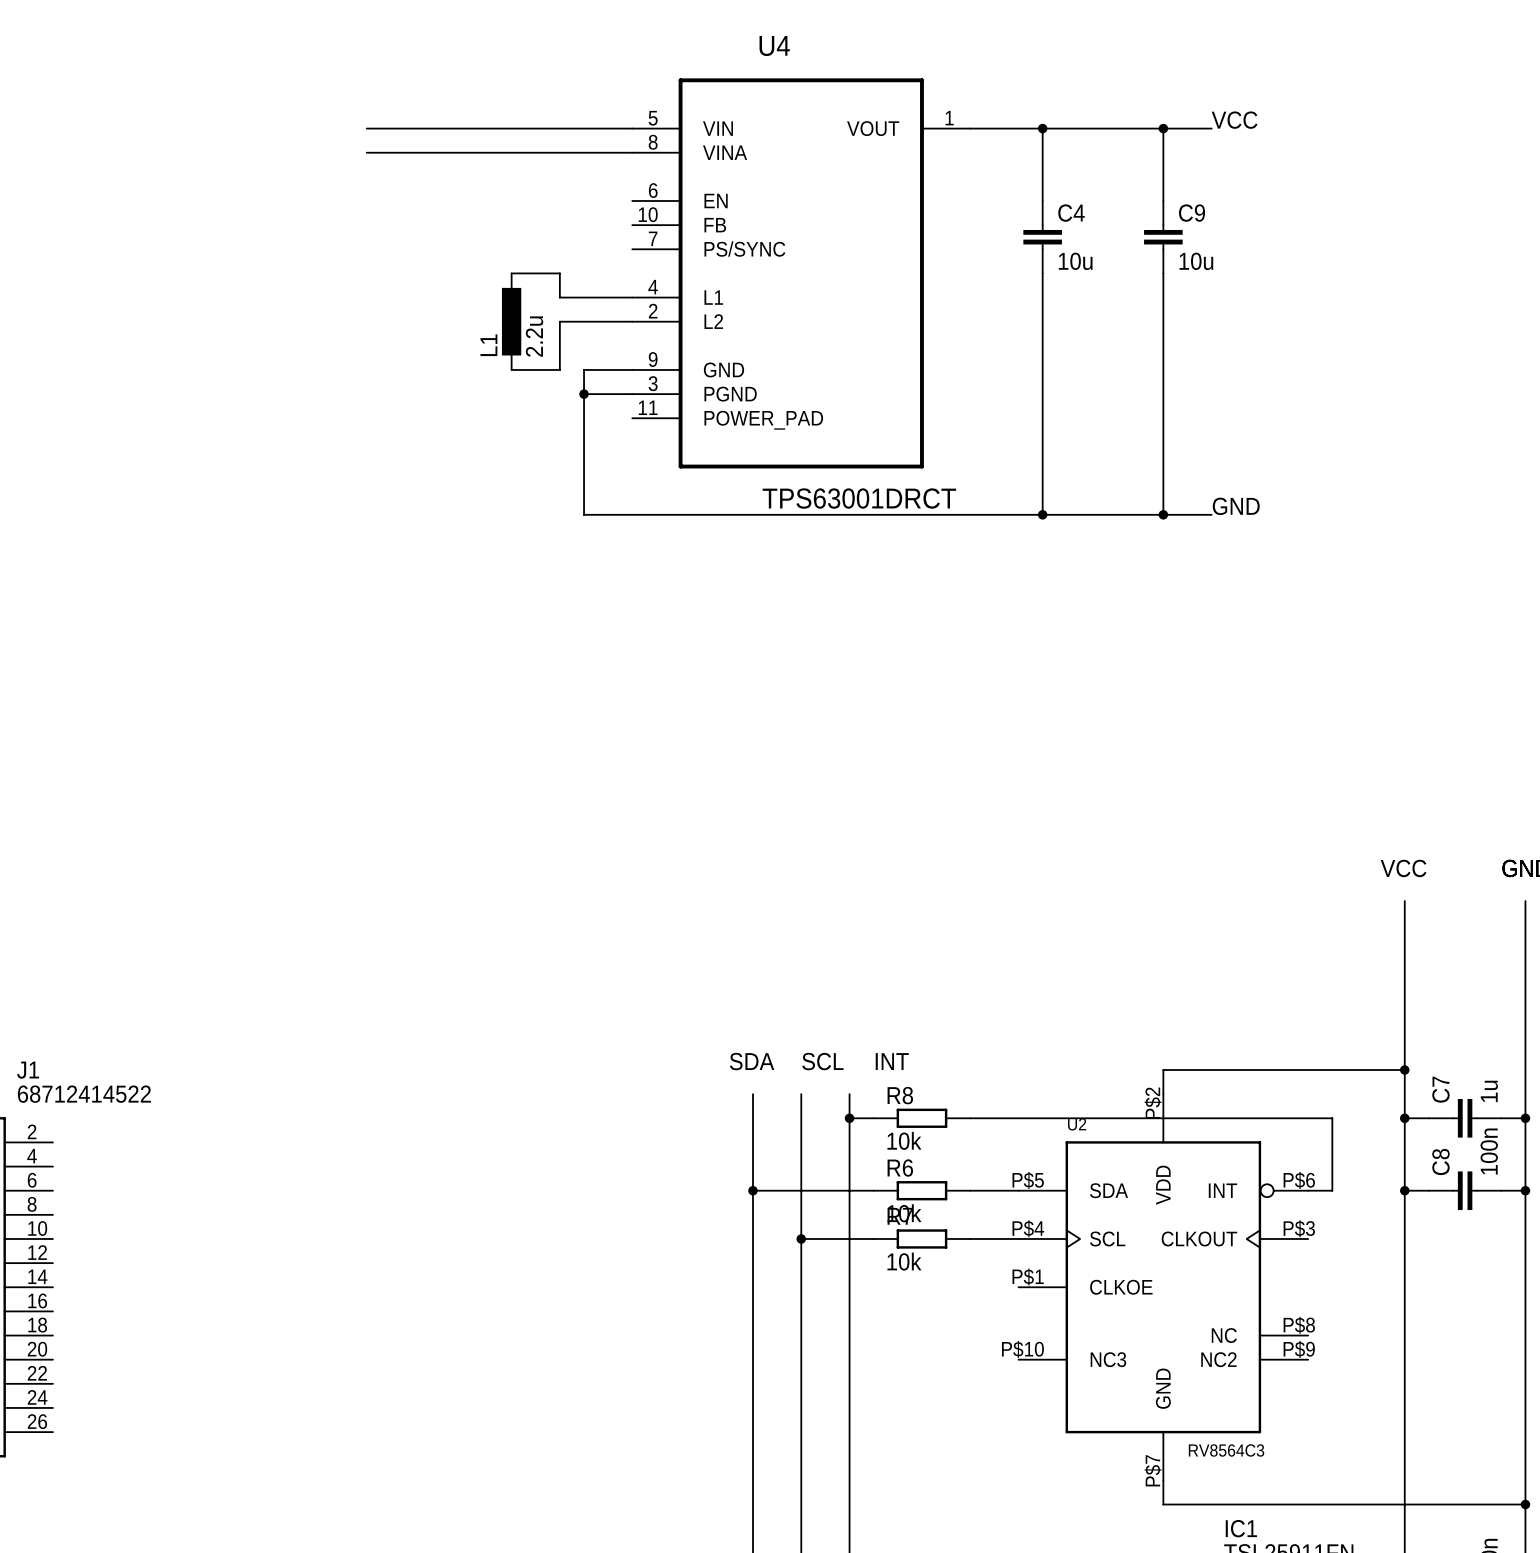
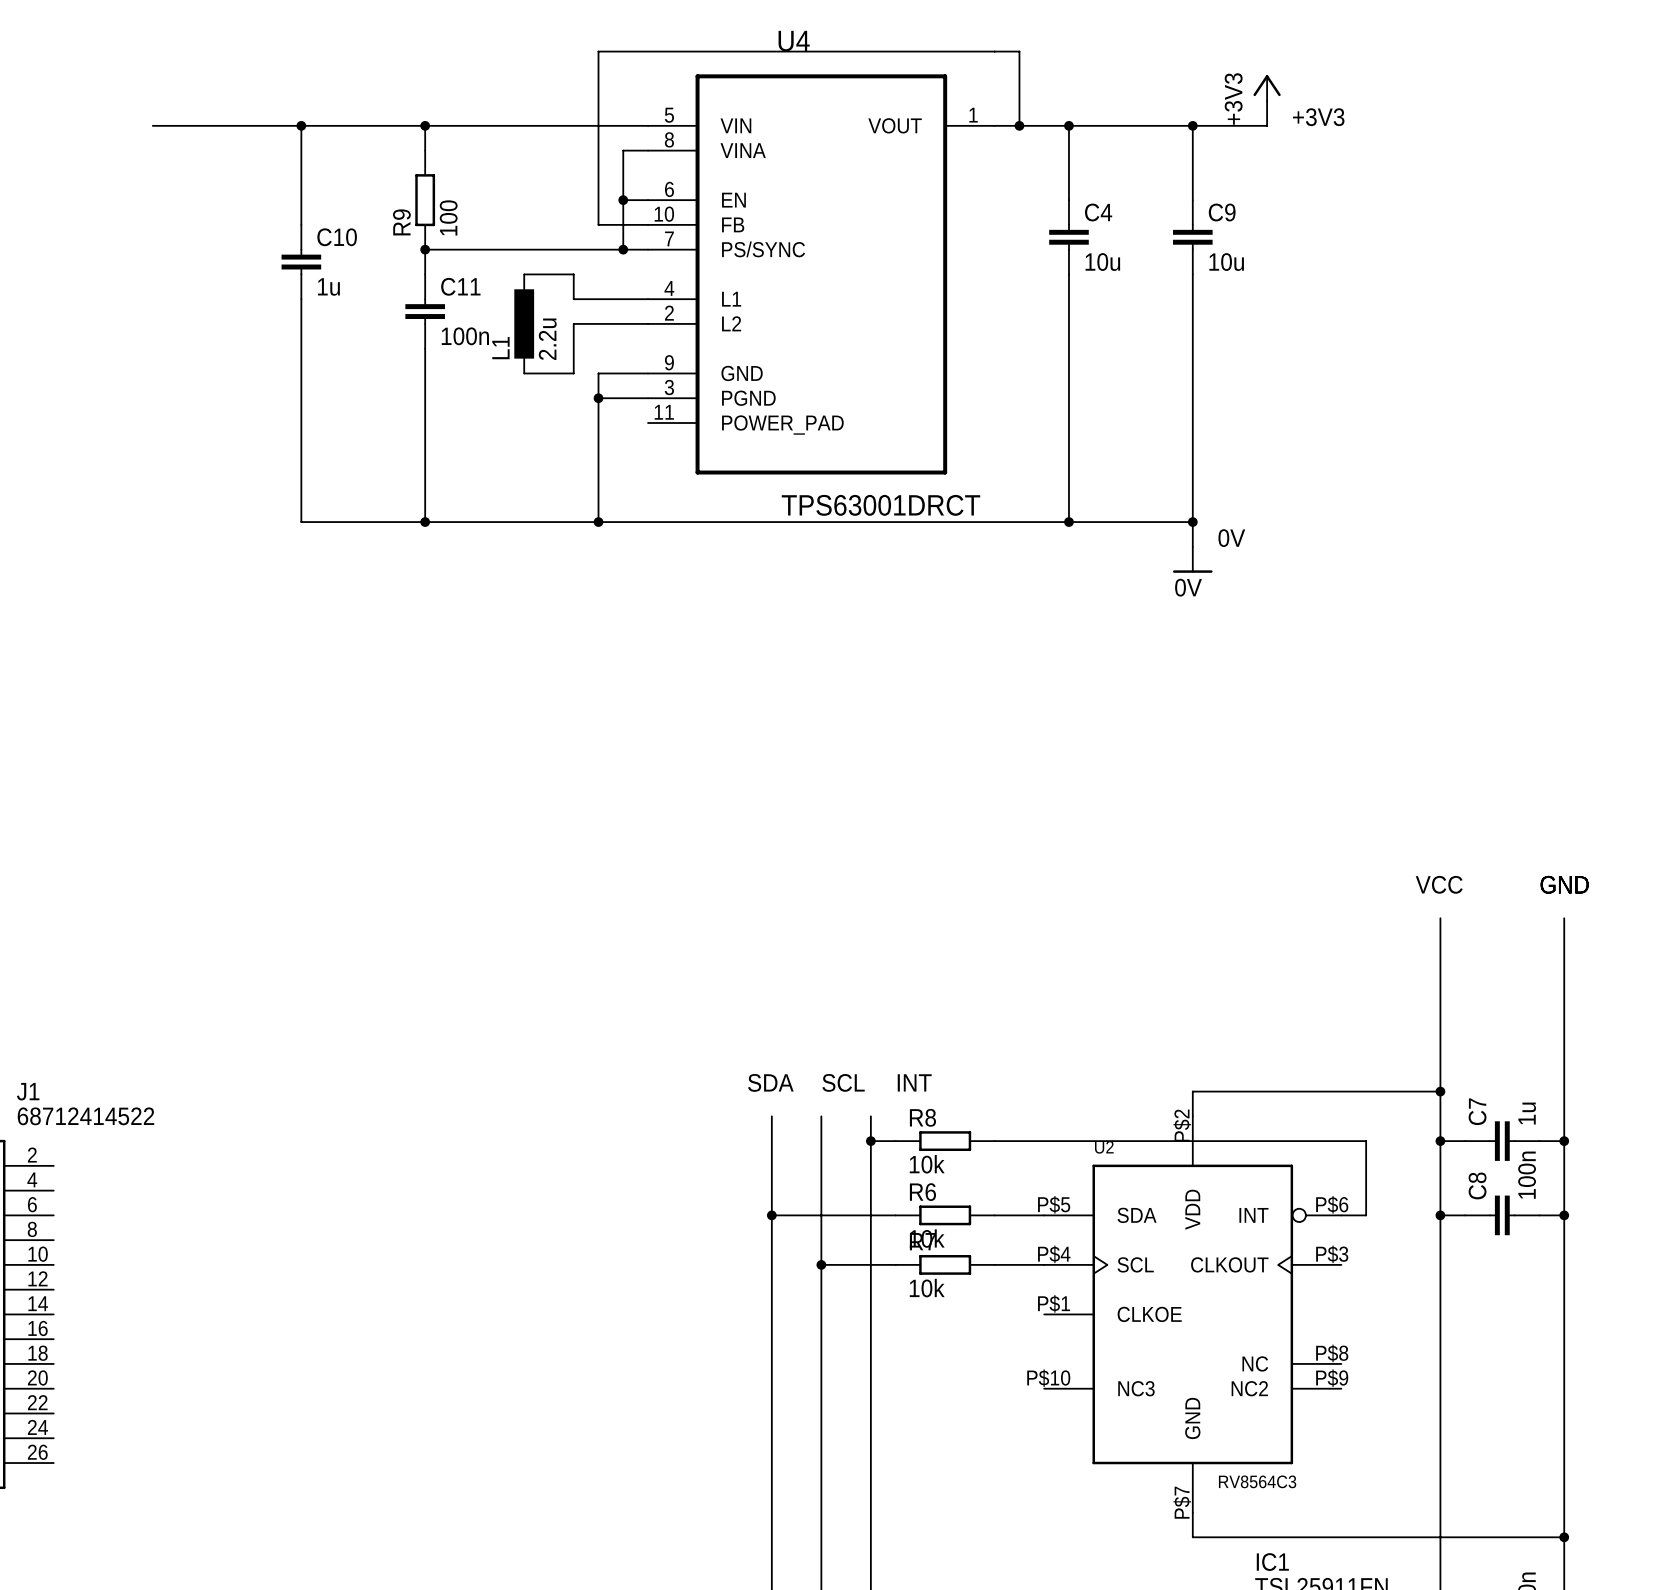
power symbol: none -> +3V3 (1267, 88)
wire: none -> (1267, 101) (1267, 125) (1242, 125)
label: VCC (1234, 120) -> none
label: none -> +3V3 (1318, 117)
wire: none -> (152, 125) (375, 125)
wire: none -> (301, 125) (301, 224)
junction: none -> (301, 125)
wire: none -> (425, 125) (425, 150)
junction: none -> (425, 125)
wire: none -> (1019, 125) (1019, 51) (598, 51) (598, 224) (648, 224)
junction: none -> (1019, 125)
wire: (366, 152) (608, 152) -> (623, 249) (623, 150)
R9: none -> 100 (425, 200)
wire: none -> (623, 200) (648, 200)
junction: none -> (623, 200)
junction: none -> (425, 249)
junction: none -> (623, 249)
wire: none -> (648, 249) (425, 249) (425, 274)
C10: none -> 1u (301, 262)
wire: none -> (301, 299) (301, 522) (598, 522)
C11: none -> 100n (425, 311)
wire: none -> (425, 348) (425, 522)
label: GND (1236, 506) -> none
junction: none -> (425, 522)
junction: none -> (598, 522)
wire: (1163, 514) (1211, 514) -> (1192, 522) (1192, 546)
label: none -> 0V (1231, 538)
power symbol: none -> 0V (1192, 559)

